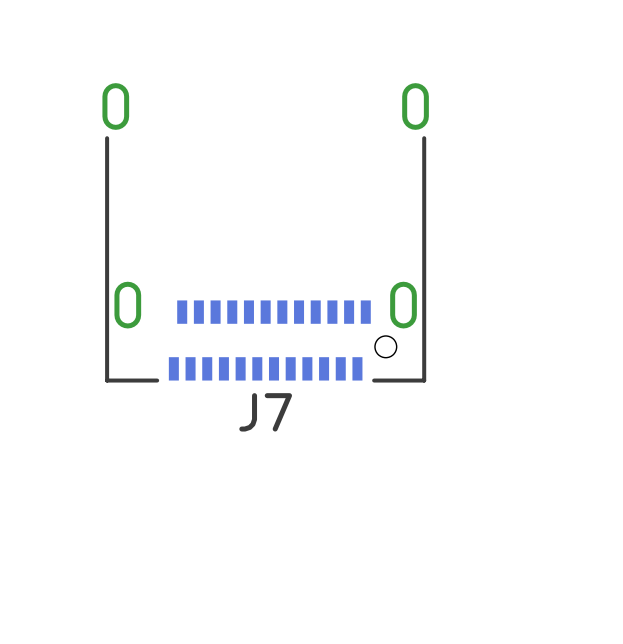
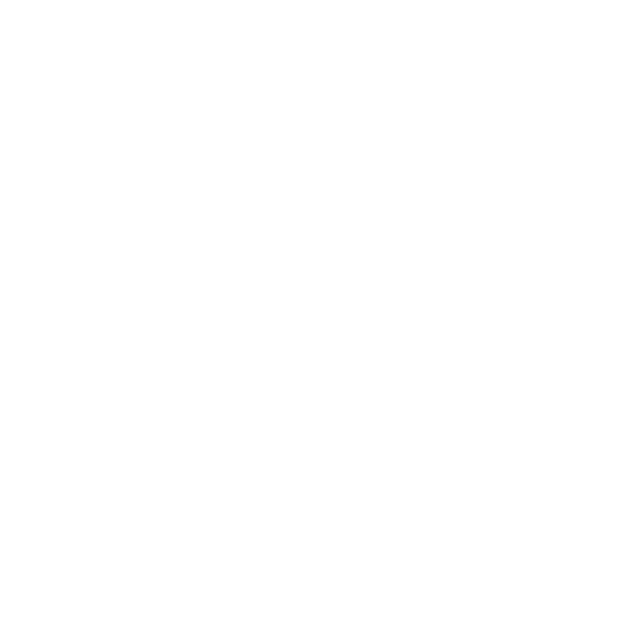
J7: (265, 232) -> none

